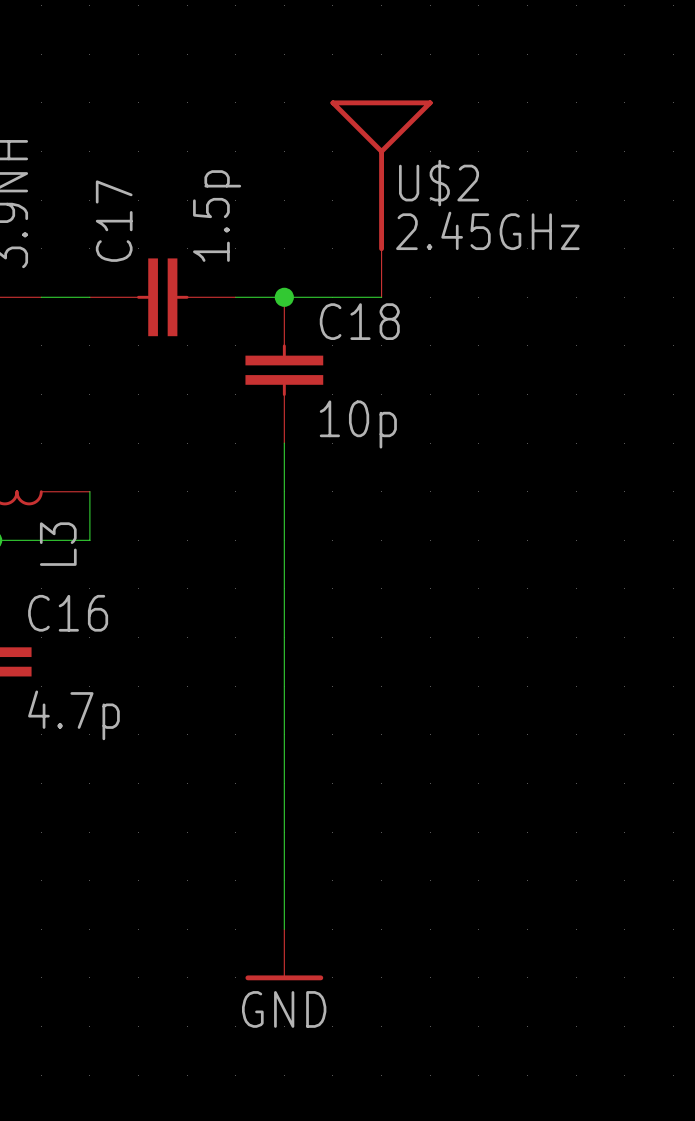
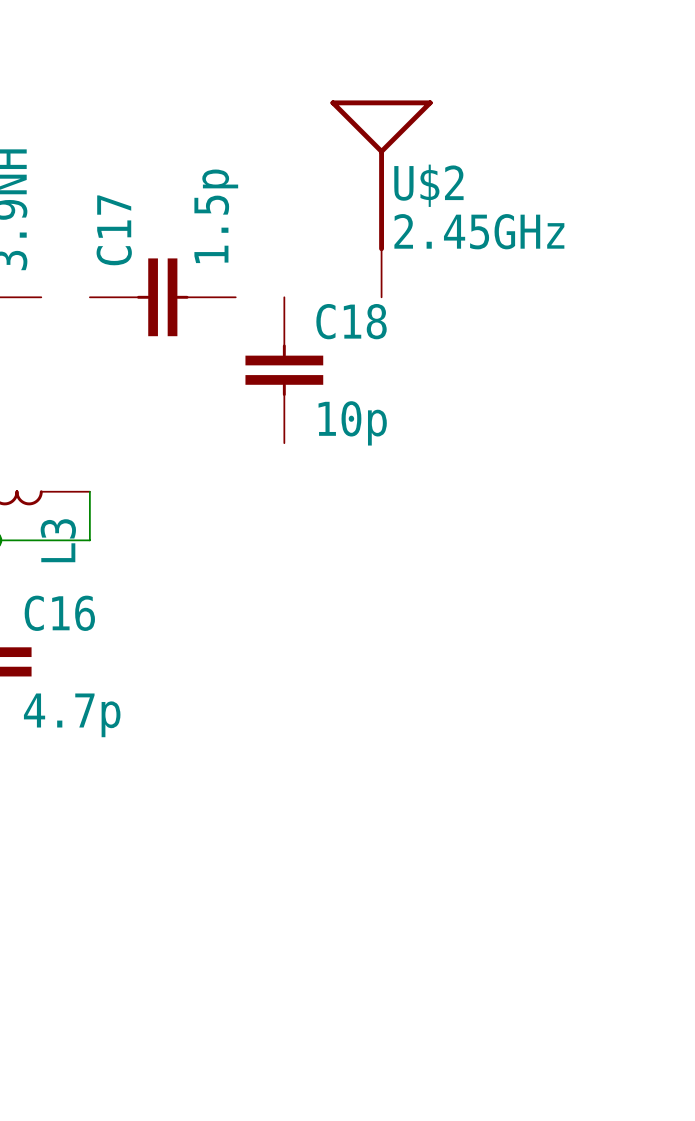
wire: (41, 297) (89, 297) -> none
wire: (235, 297) (381, 297) -> none
junction: (284, 297) -> none
wire: (284, 443) (284, 929) -> none
power symbol: GND (284, 954) -> none

